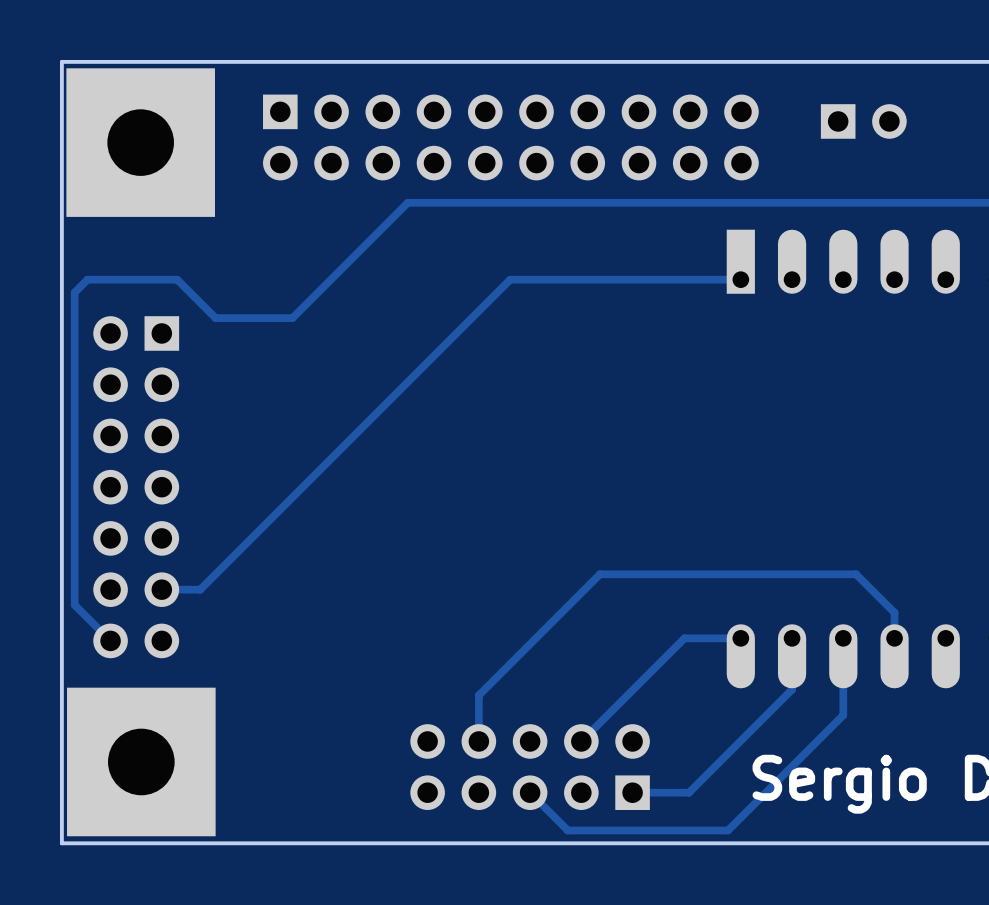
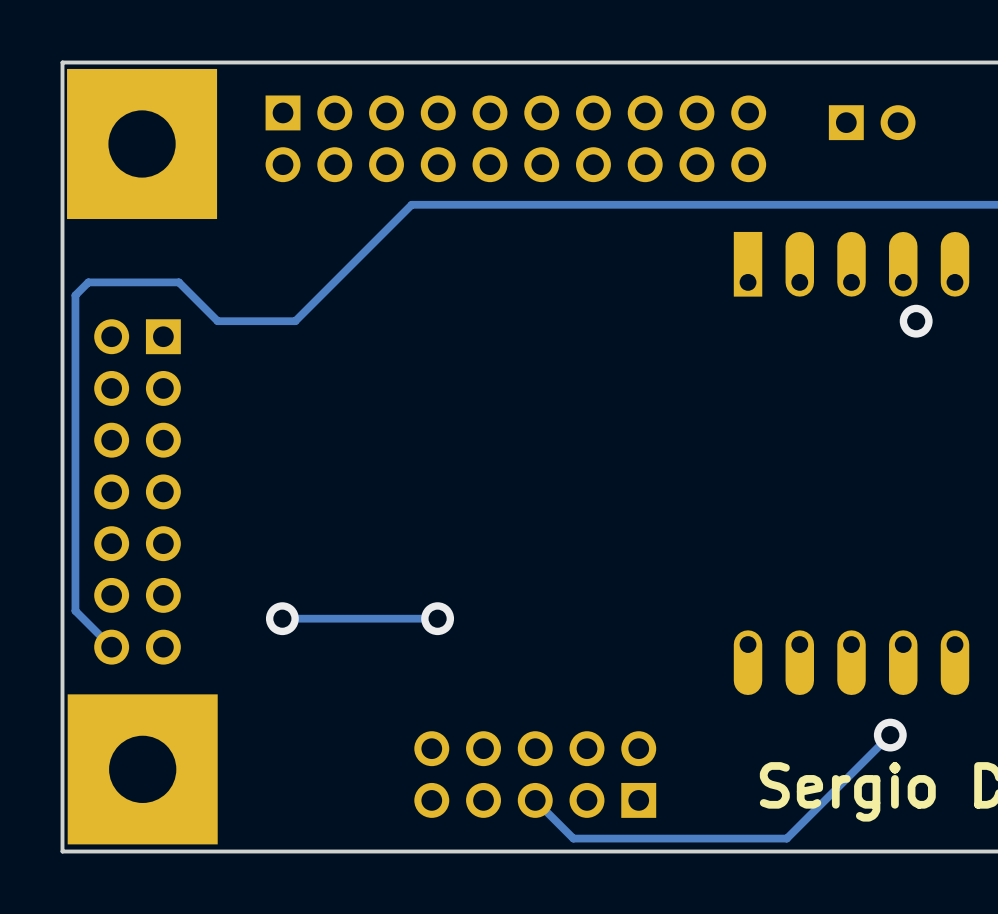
track: (740, 279) (510, 279) (200, 589) (161, 589) -> none
via: none -> (916, 321)
via: none -> (282, 618)
track: none -> (437, 618) (282, 618)
via: none -> (437, 618)
track: (740, 638) (684, 638) (581, 741) -> none
track: (792, 638) (792, 689) (688, 792) (632, 792) -> none
track: (843, 638) (843, 715) (728, 830) -> (890, 735) (786, 838) (735, 838)
track: (894, 638) (894, 612) (856, 574) (599, 574) (478, 695) (478, 741) -> none
via: none -> (890, 735)

